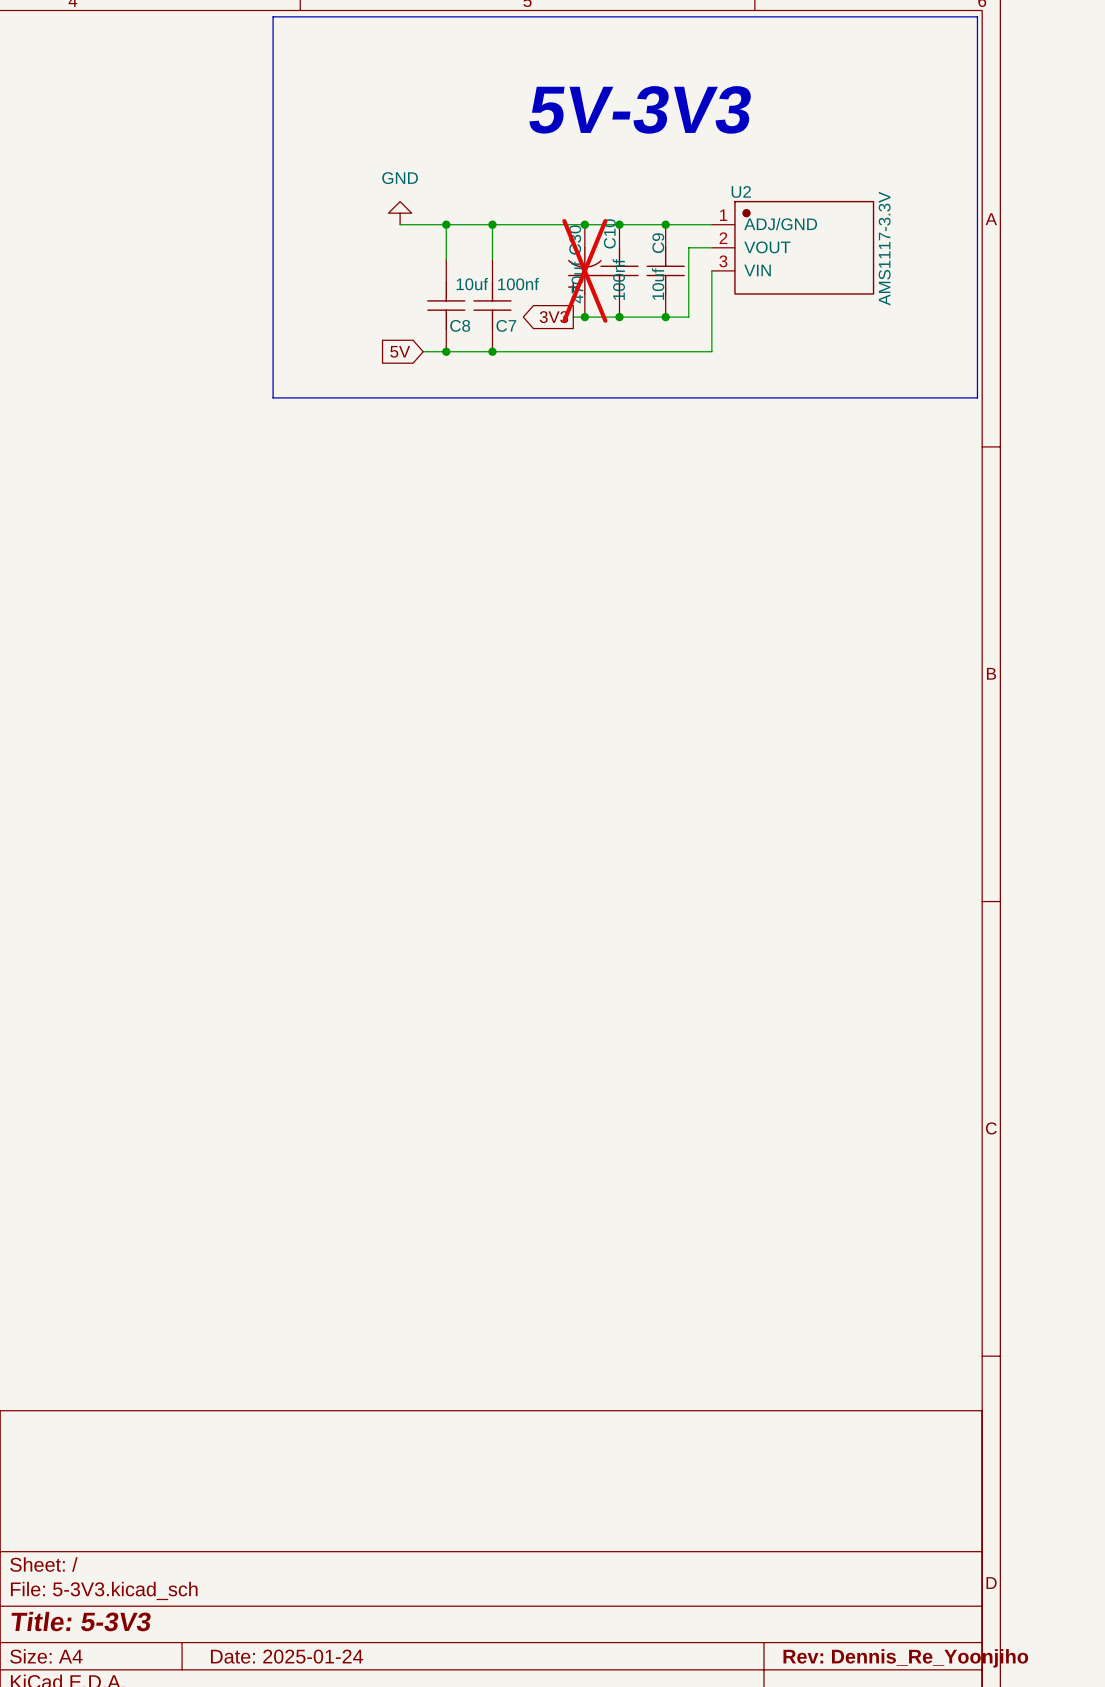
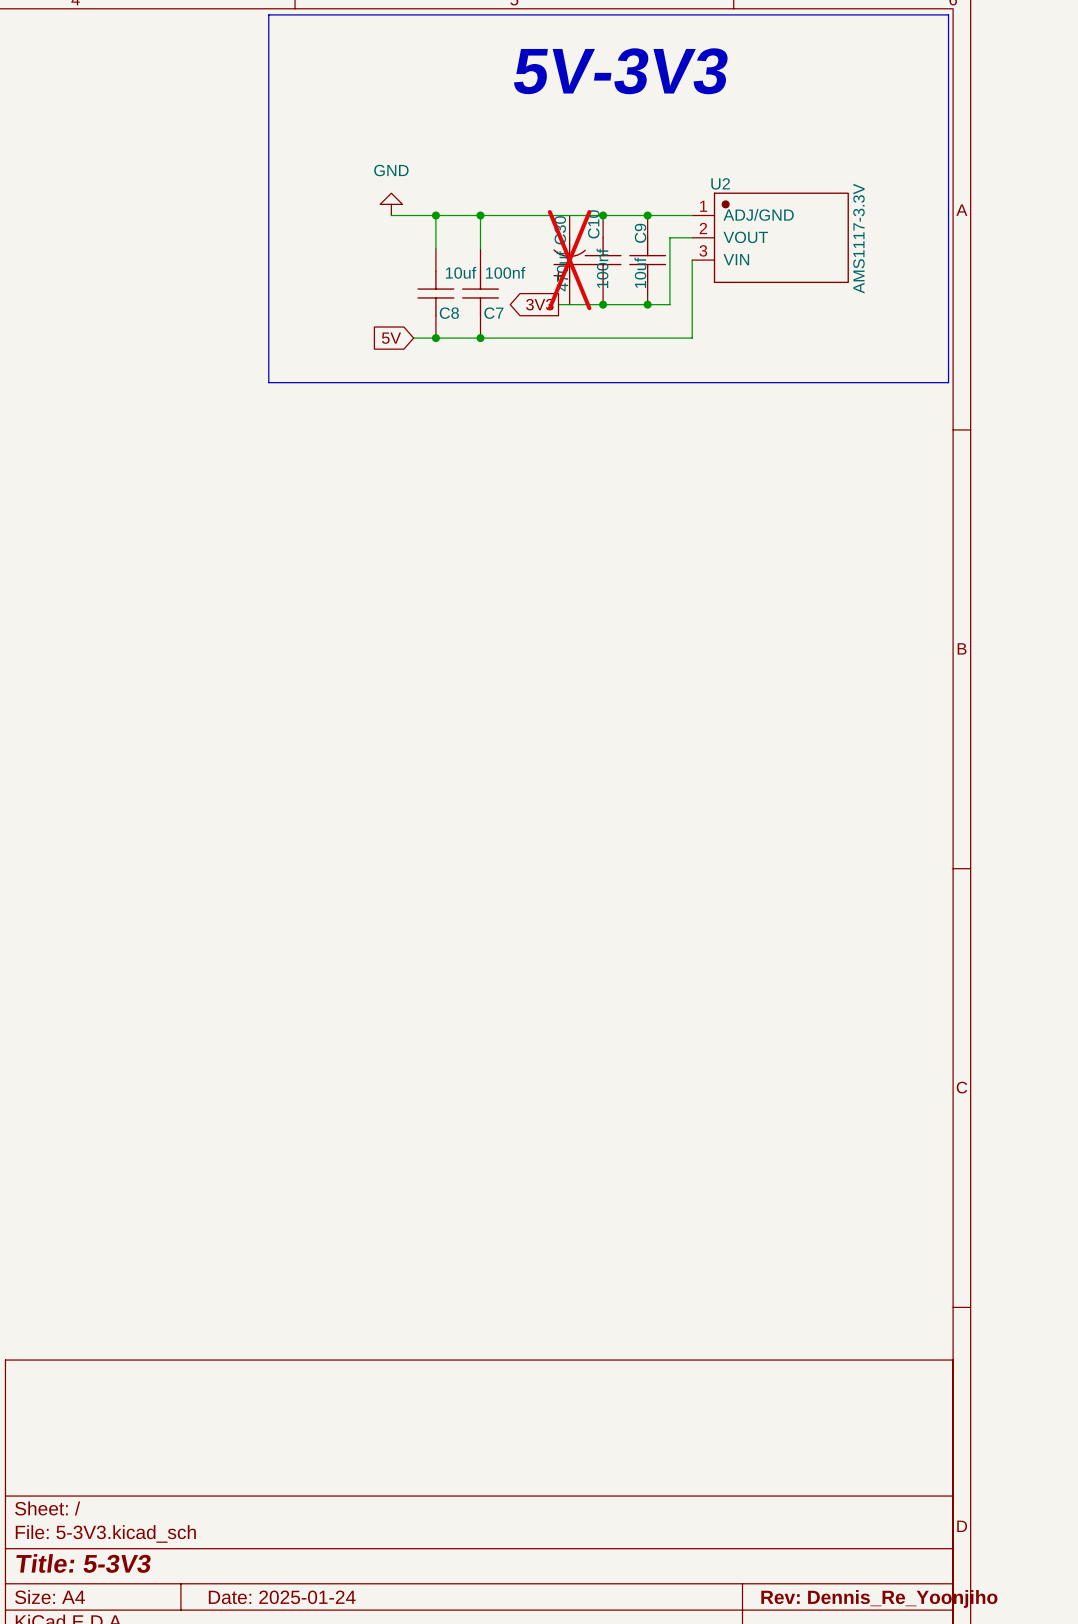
text position: 5V-3V3 (640, 109) -> 5V-3V3 (621, 71)
junction: (584, 224) -> none
junction: (584, 317) -> none

